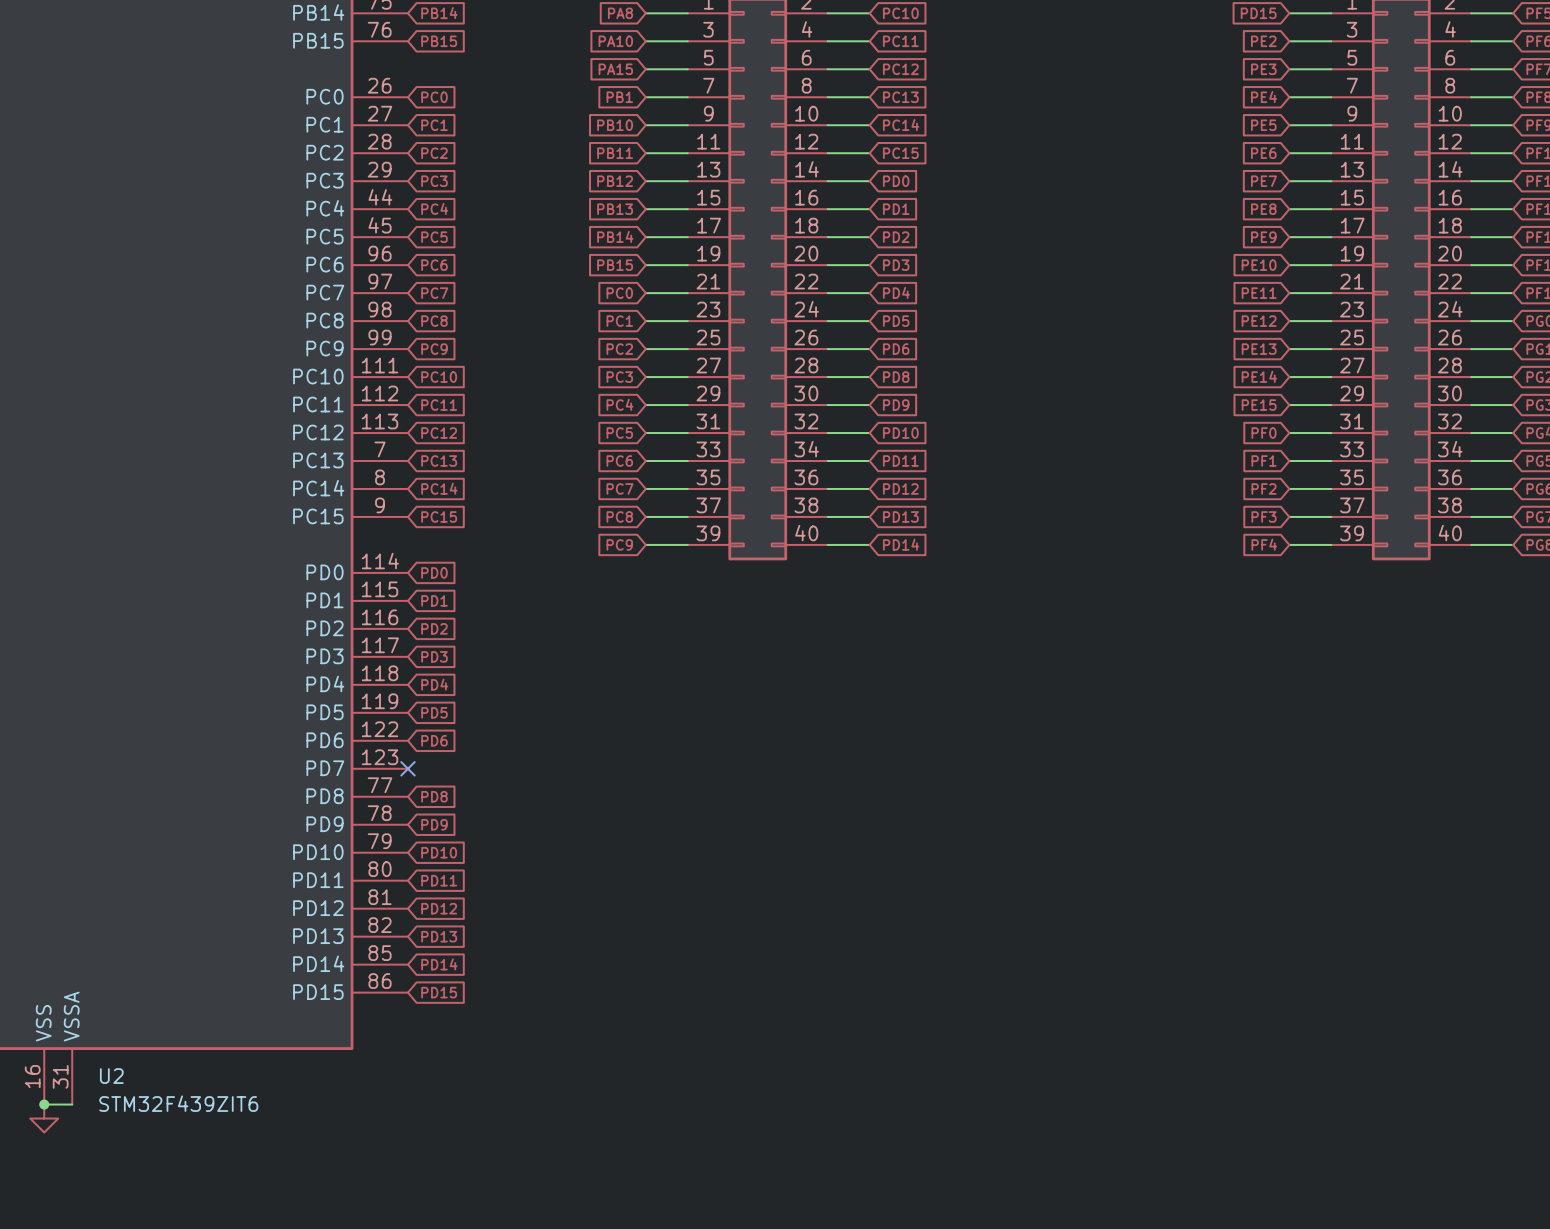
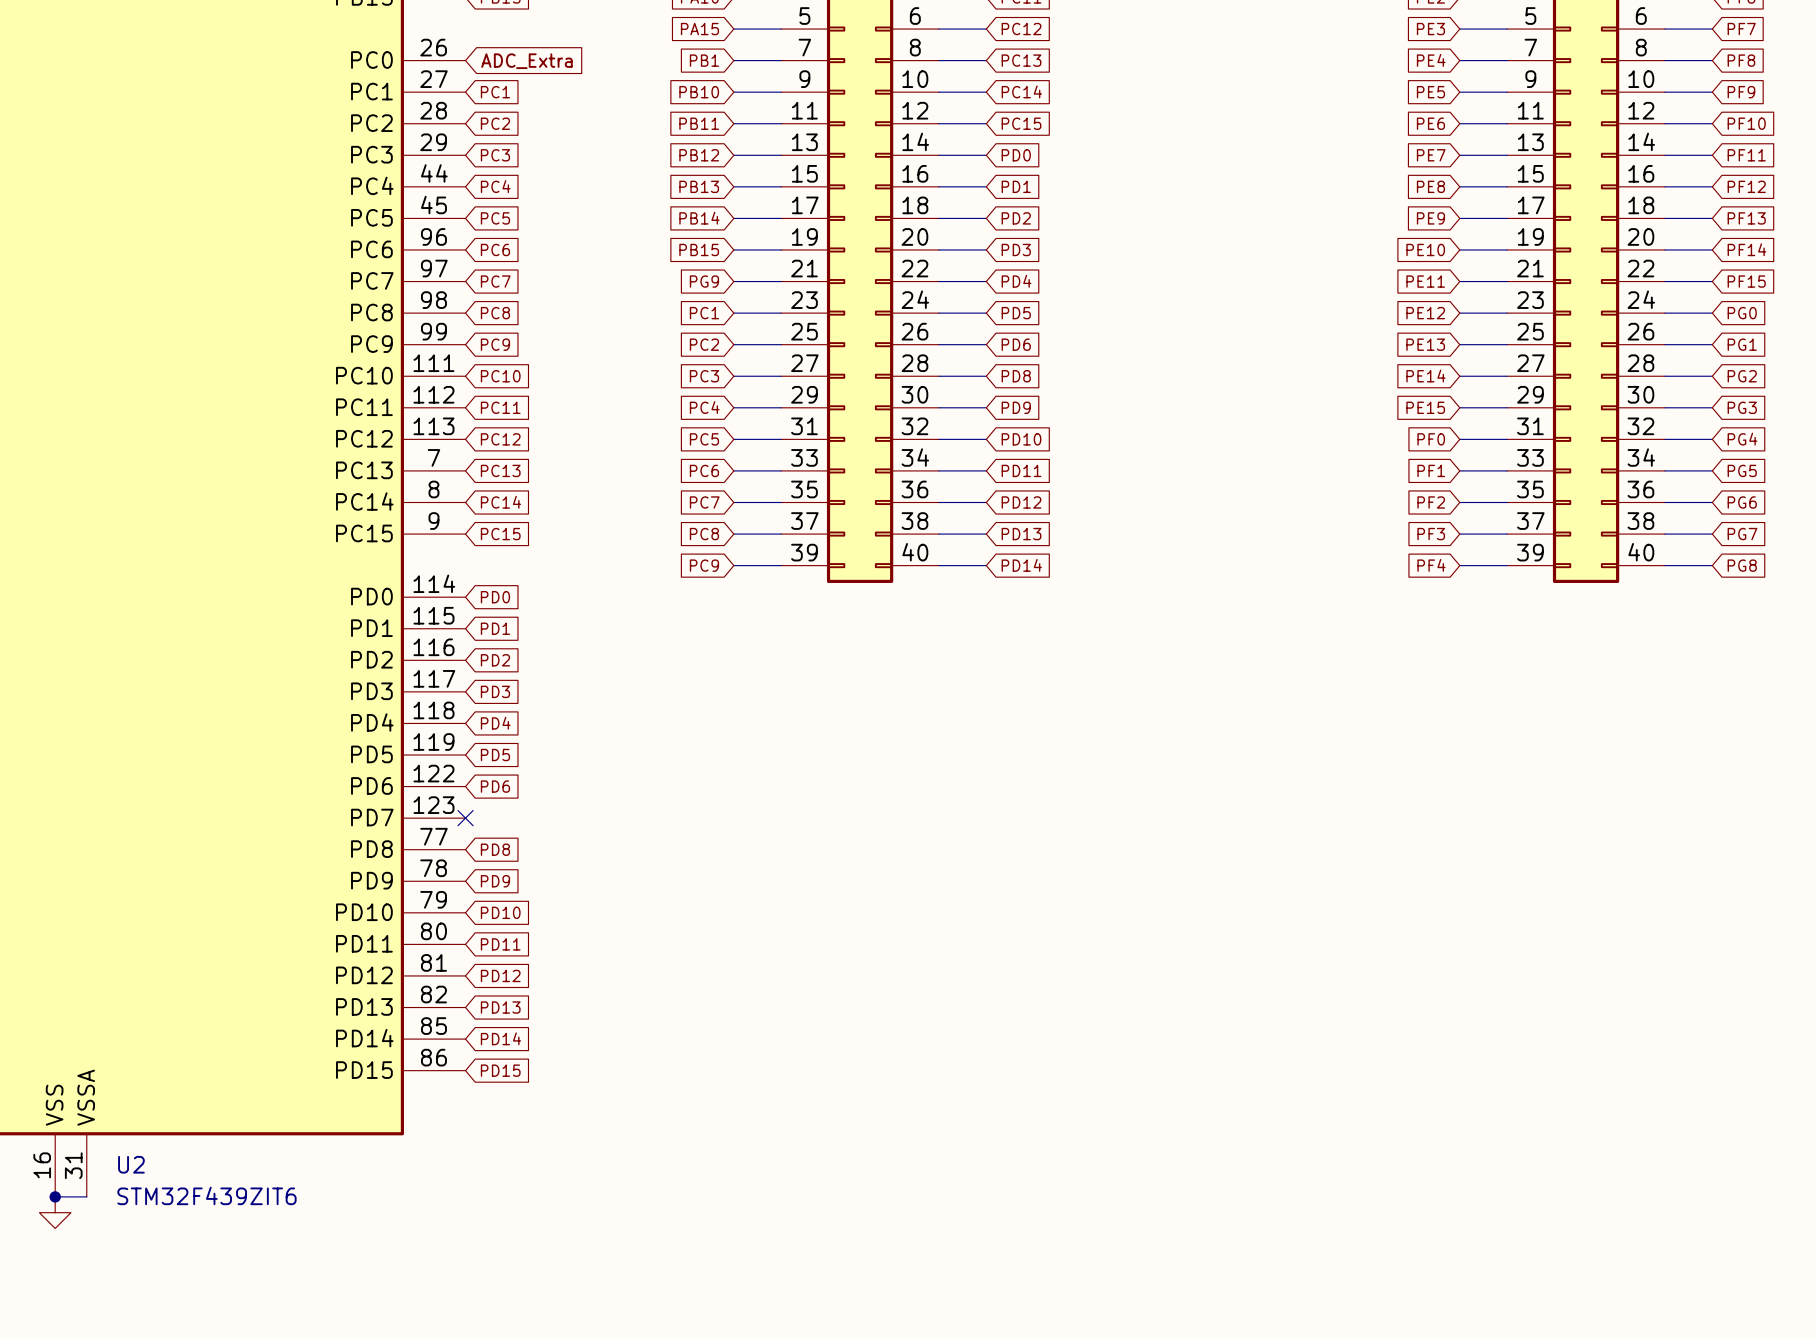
global label: PC0 (434, 97) -> ADC_Extra (526, 61)
global label: PC0 (619, 293) -> PG9 (704, 281)

